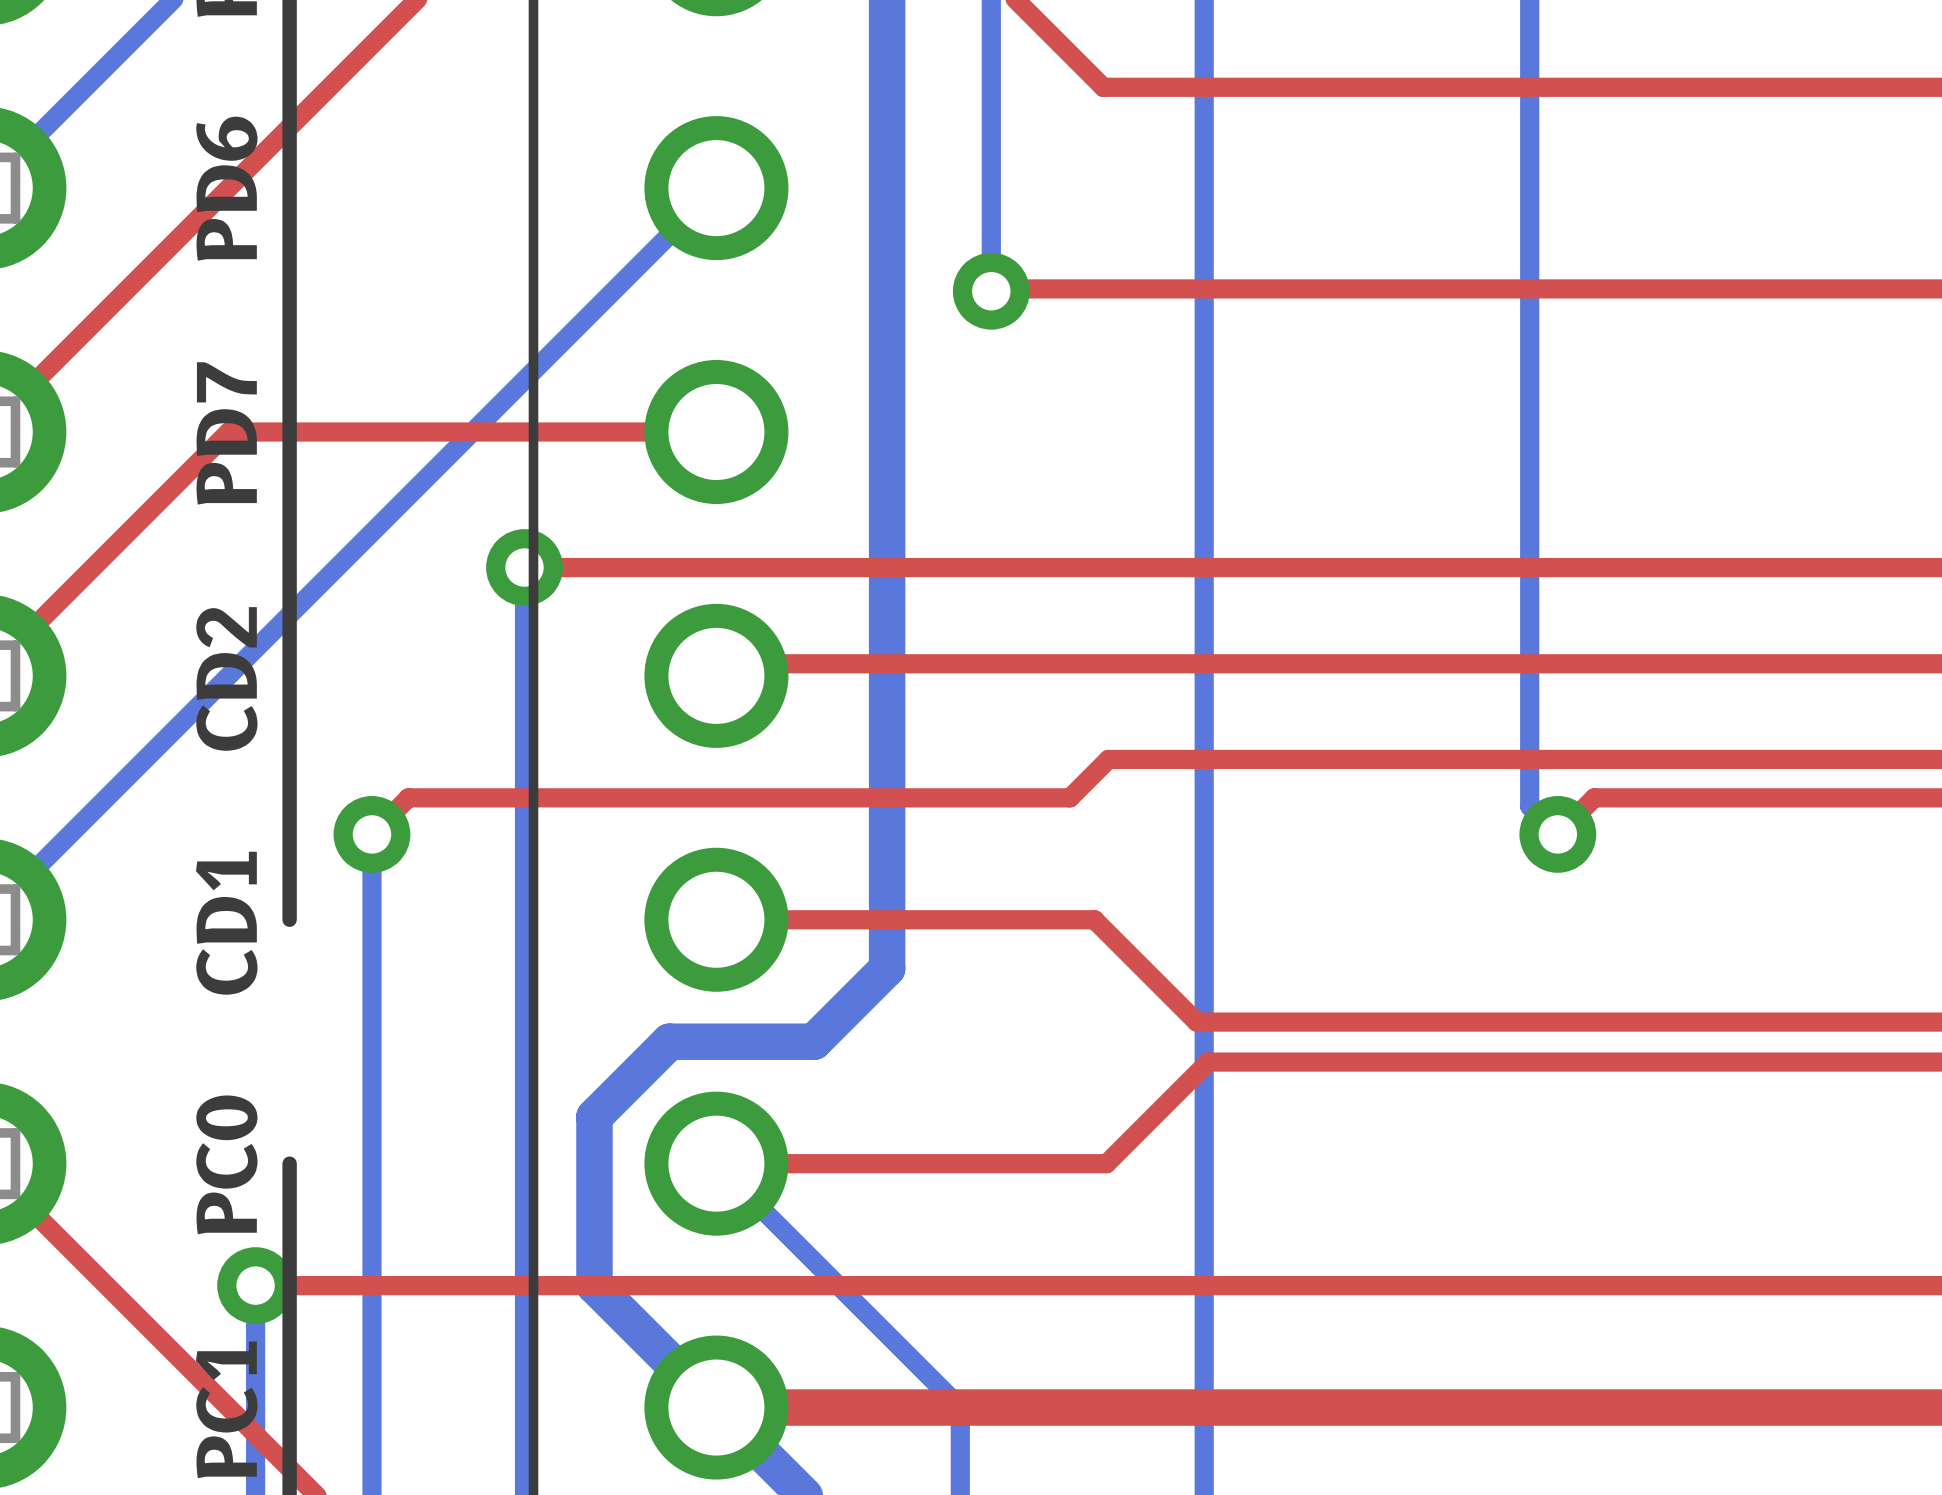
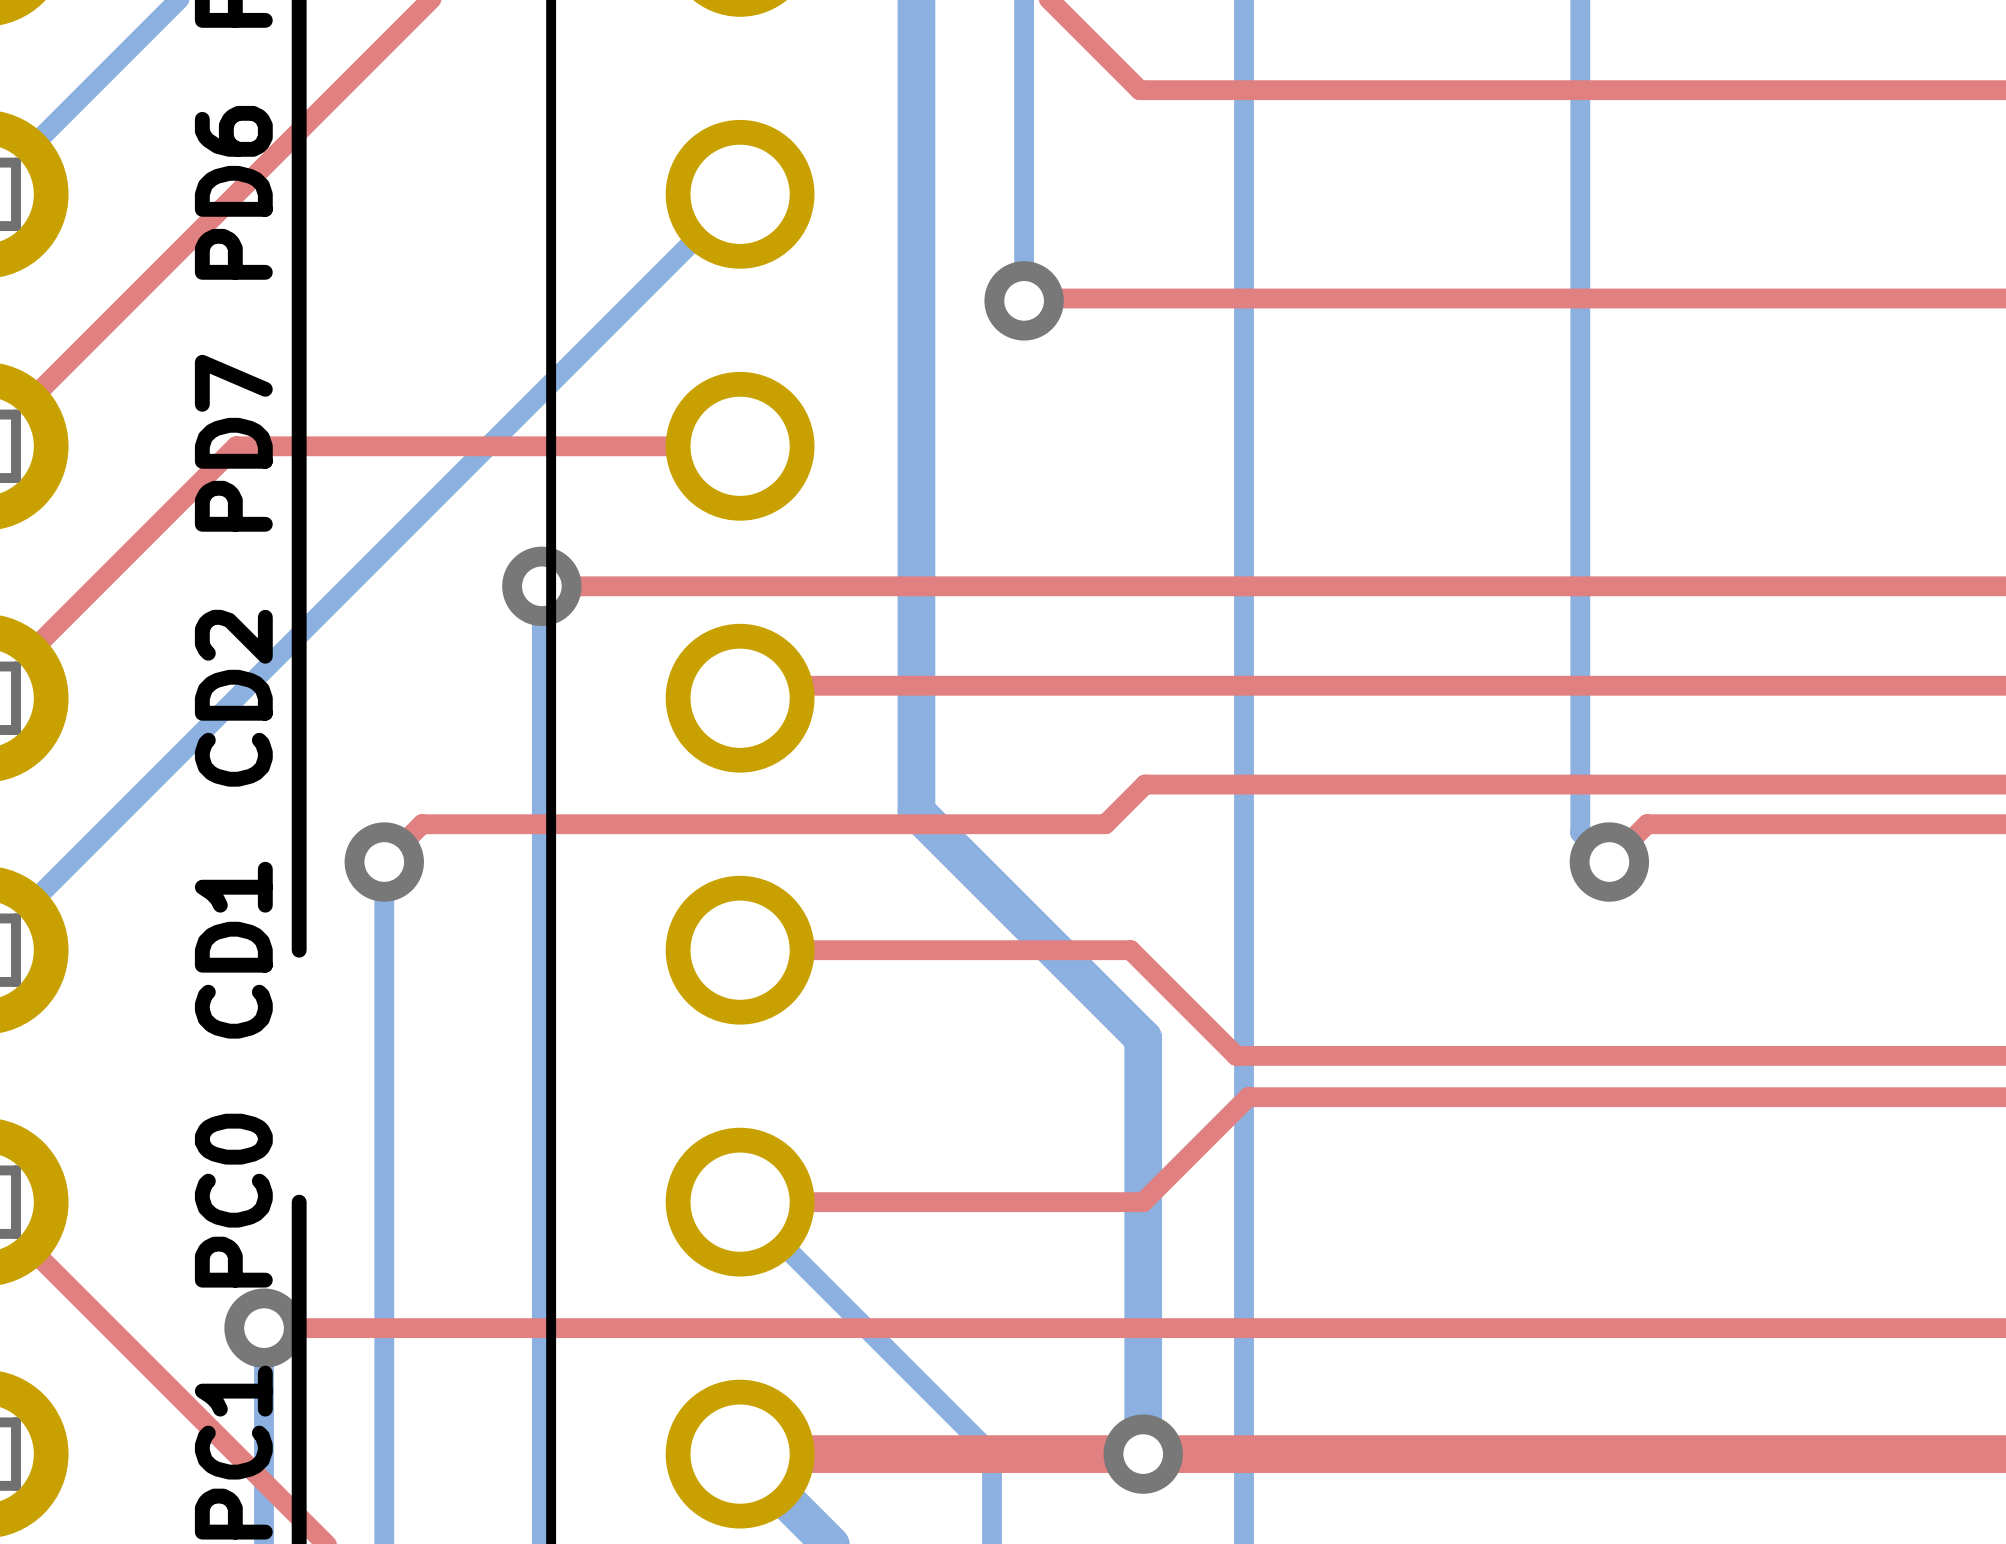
bottom track: (887, 785) (887, 968) (813, 1041) (669, 1041) (594, 1116) (594, 1285) (716, 1407) -> (916, 811) (1143, 1038) (1143, 1454)
via: none -> (1143, 1454)

